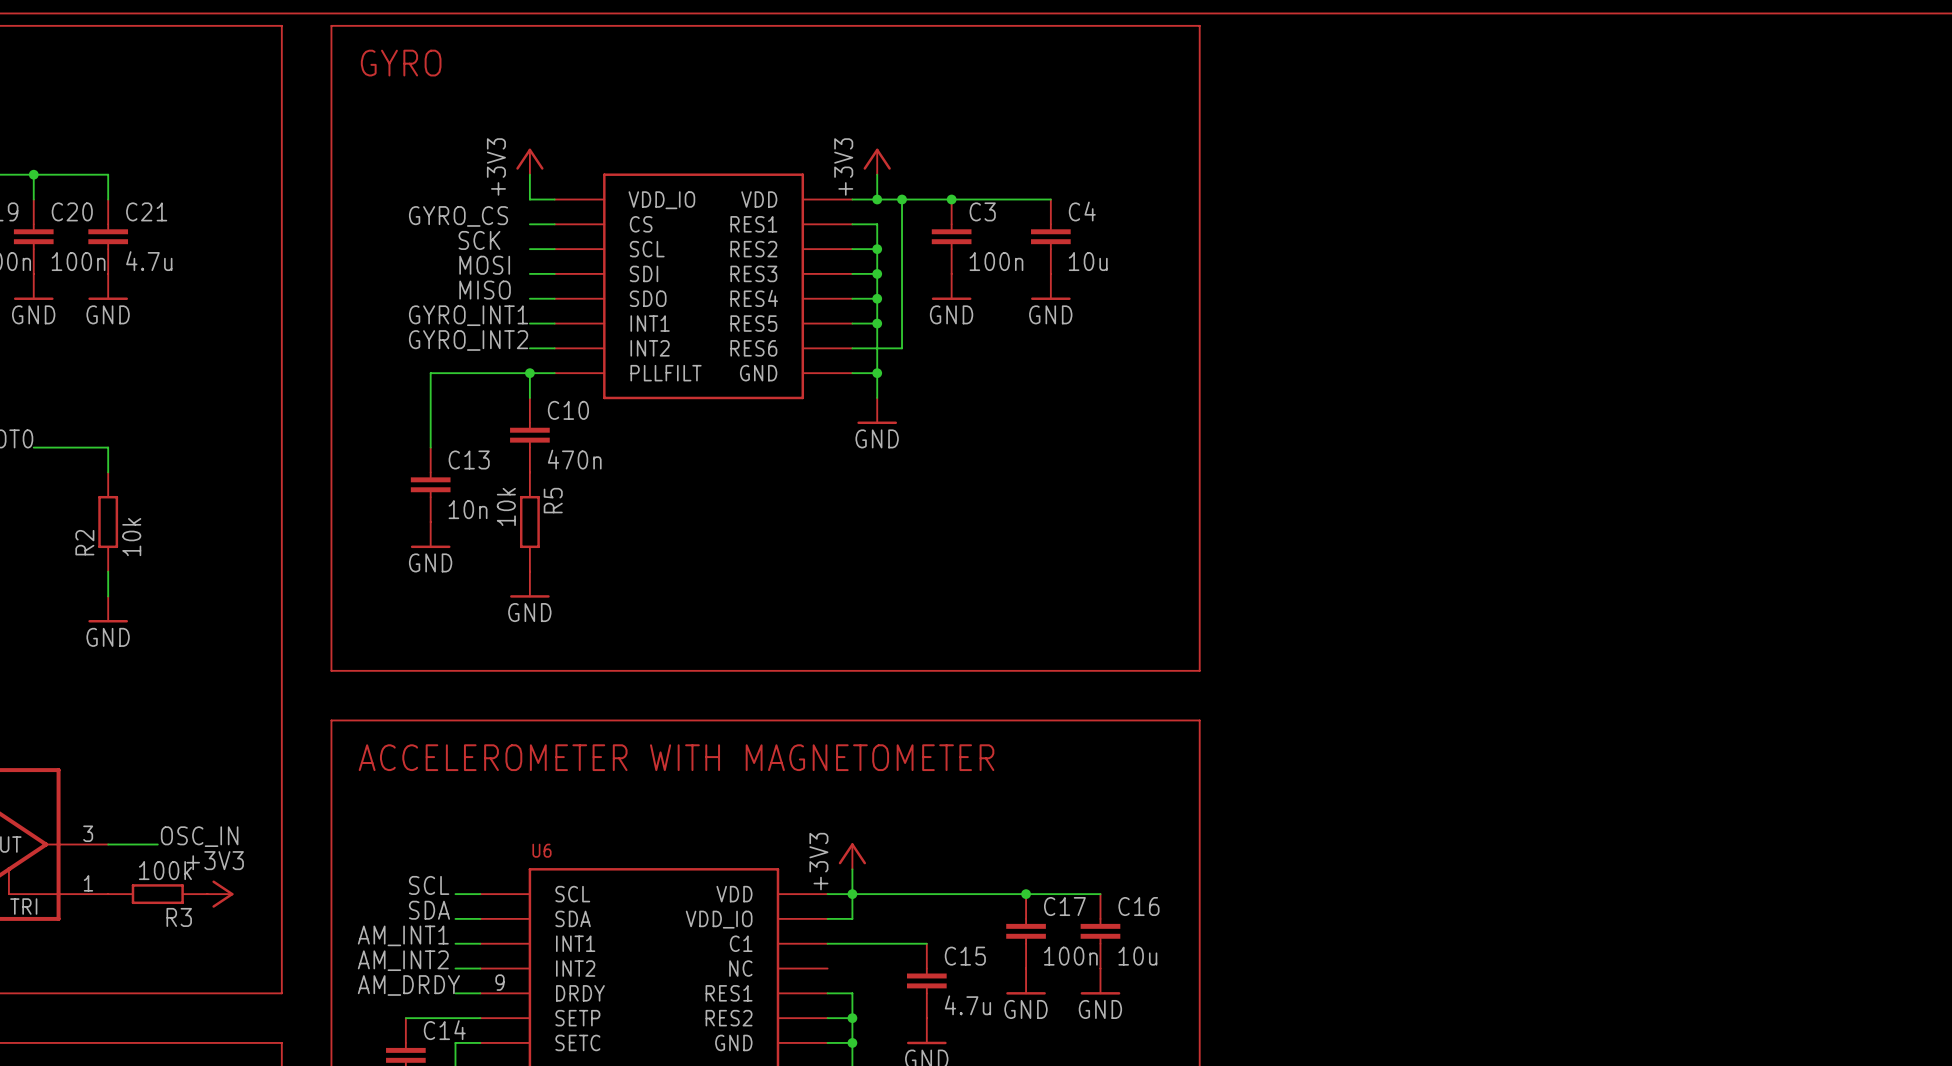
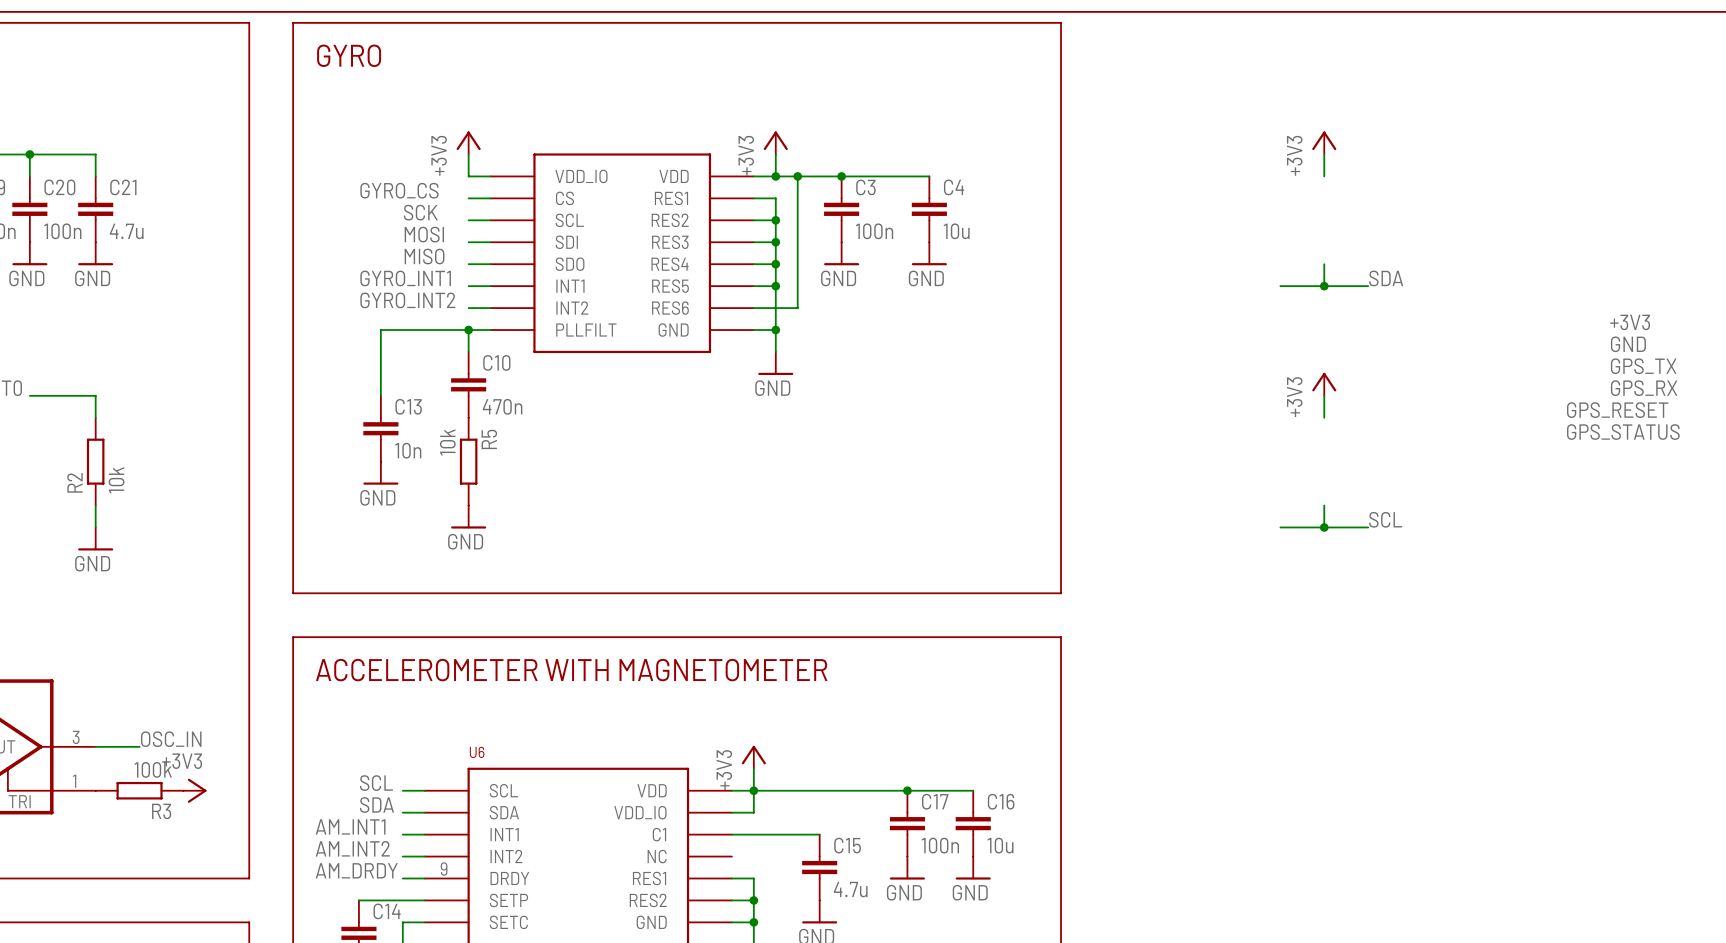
power symbol: none -> +3V3 (1324, 142)
wire: none -> (1324, 154) (1324, 176)
wire: none -> (1324, 264) (1324, 286)
label: none -> SDA (1386, 278)
wire: none -> (1280, 286) (1368, 286)
junction: none -> (1324, 286)
label: none -> +3V3 (1630, 322)
label: none -> GND (1628, 344)
label: none -> GPS_TX (1643, 366)
power symbol: none -> +3V3 (1324, 384)
label: none -> GPS_RX (1644, 388)
wire: none -> (1324, 395) (1324, 417)
label: none -> GPS_RESET (1617, 410)
label: none -> GPS_STATUS (1623, 432)
wire: none -> (1324, 505) (1324, 527)
label: none -> SCL (1385, 519)
wire: none -> (1280, 527) (1368, 527)
junction: none -> (1324, 527)

